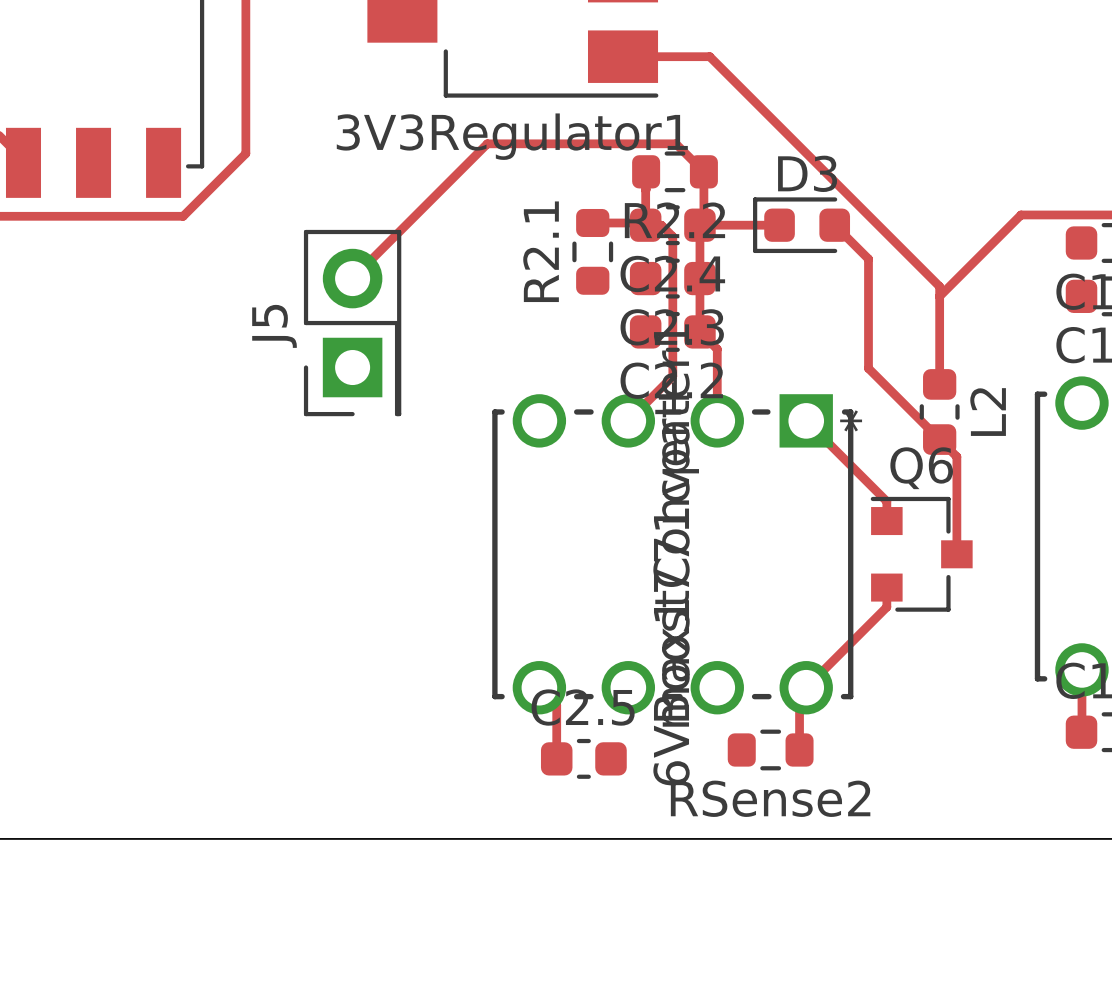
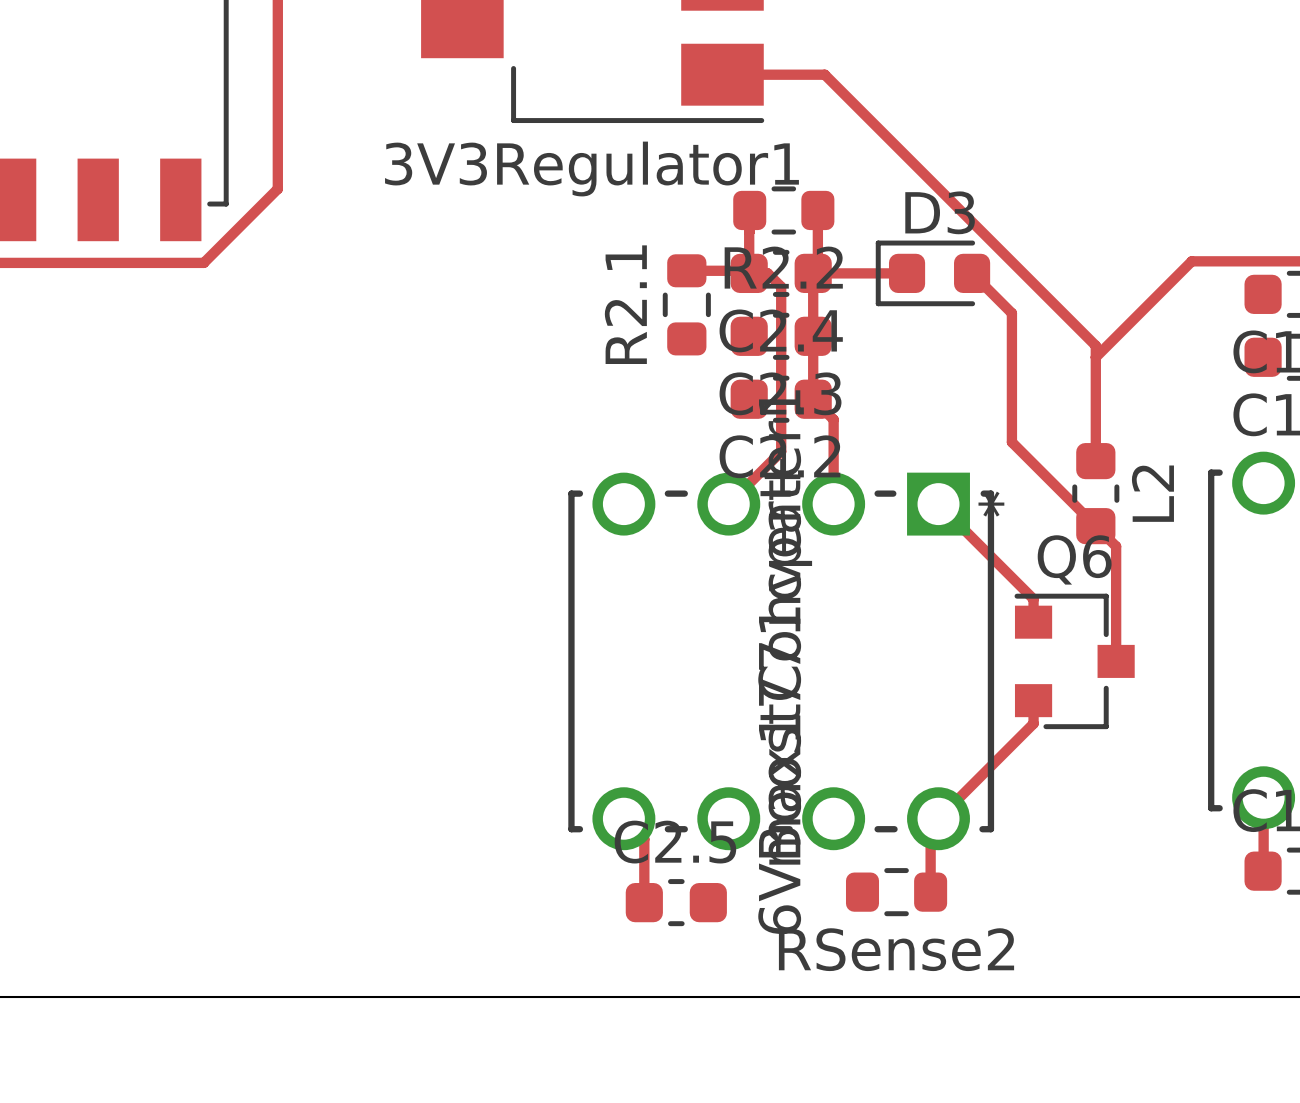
track: (703, 171) (675, 143) (487, 143) (352, 278) -> none
J5: (352, 323) -> none

